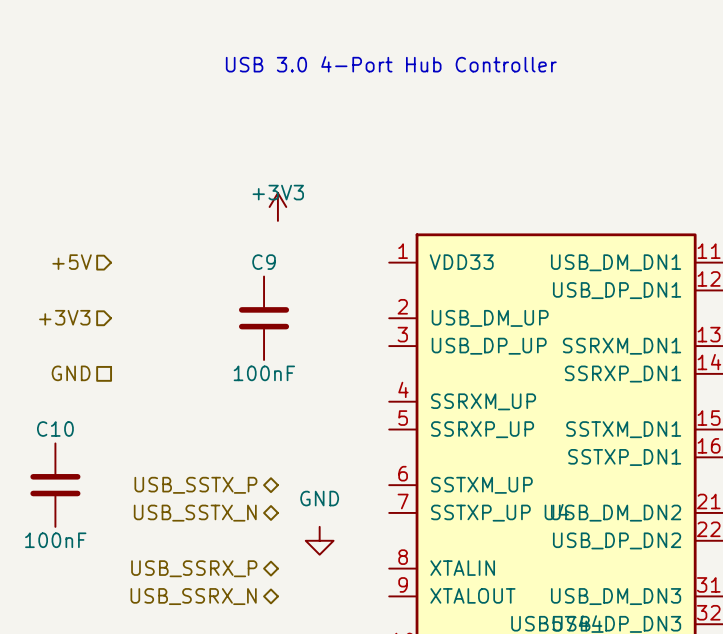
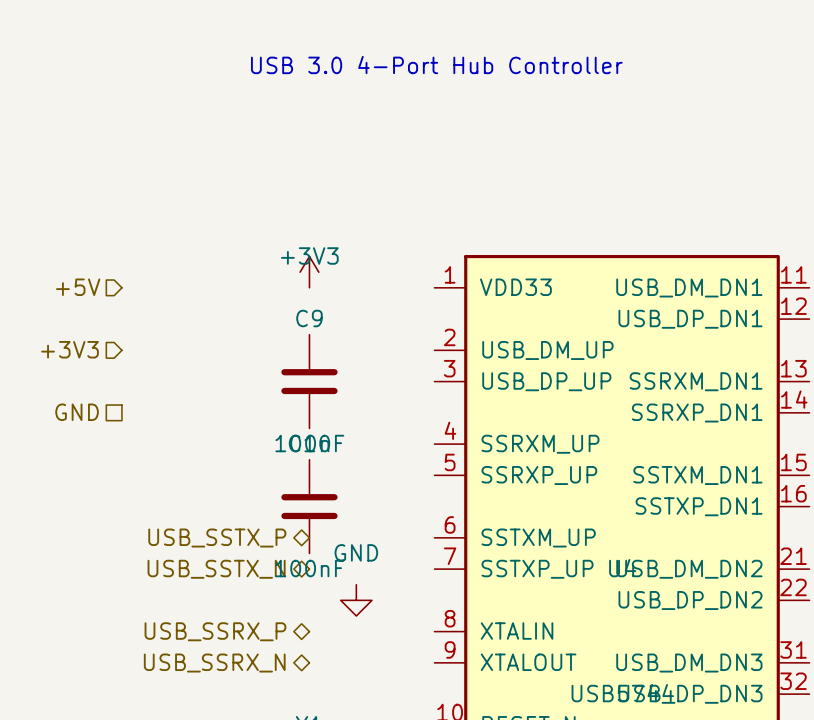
power symbol position: +3V3 (277, 206) -> +3V3 (309, 272)
C9 position: (264, 318) -> (309, 381)
C10 position: (55, 485) -> (309, 506)

